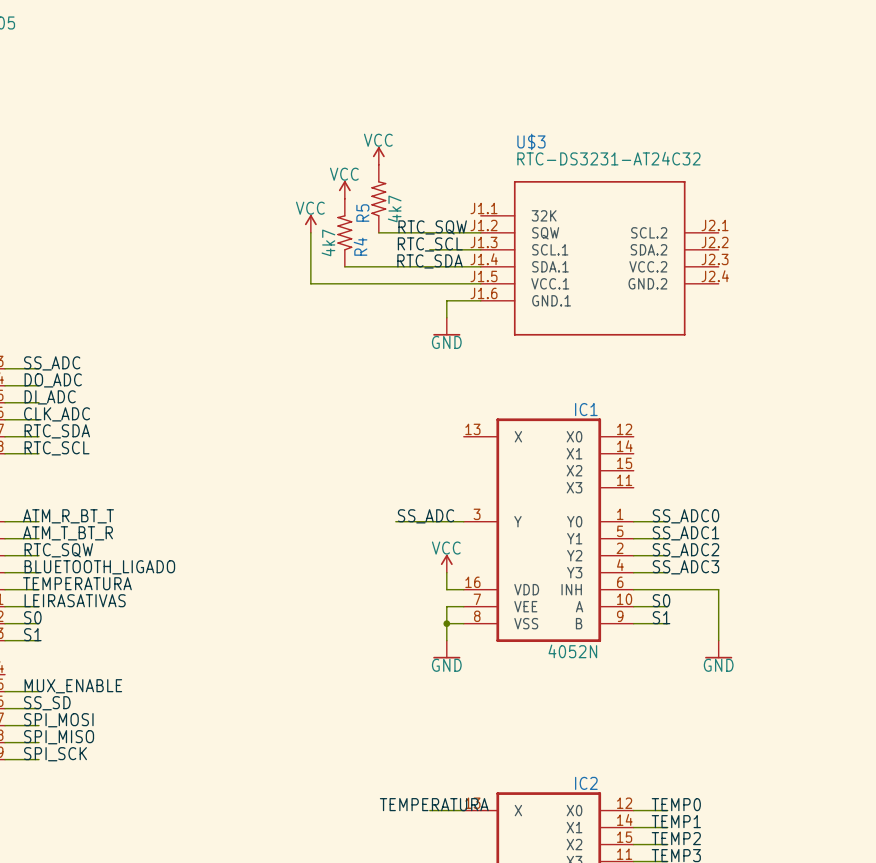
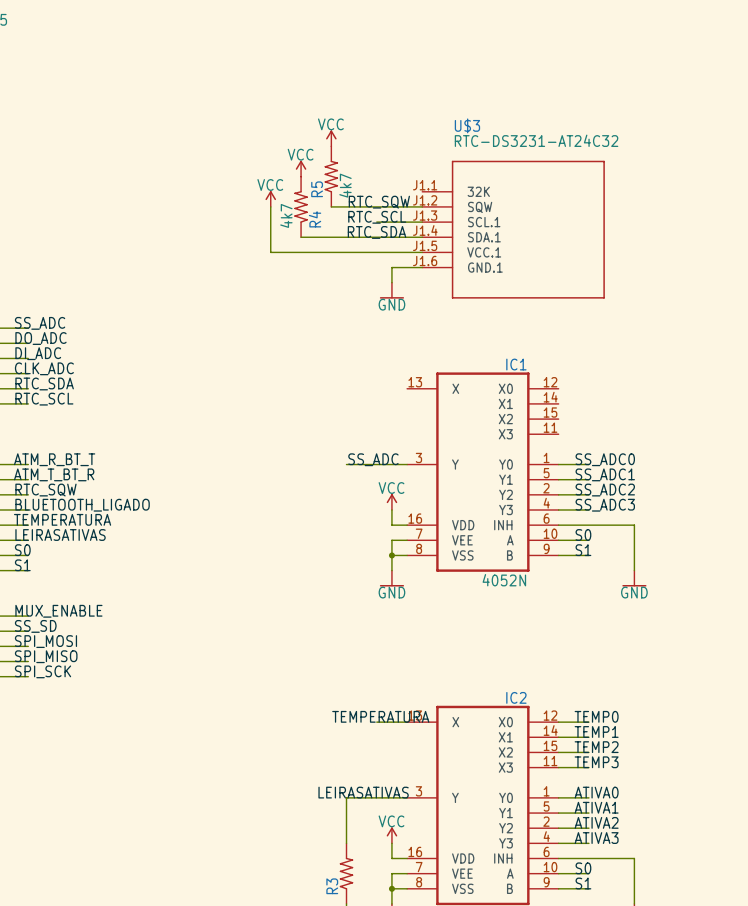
U$3 symbol: [480, 181, 719, 336] -> [422, 160, 605, 299]

